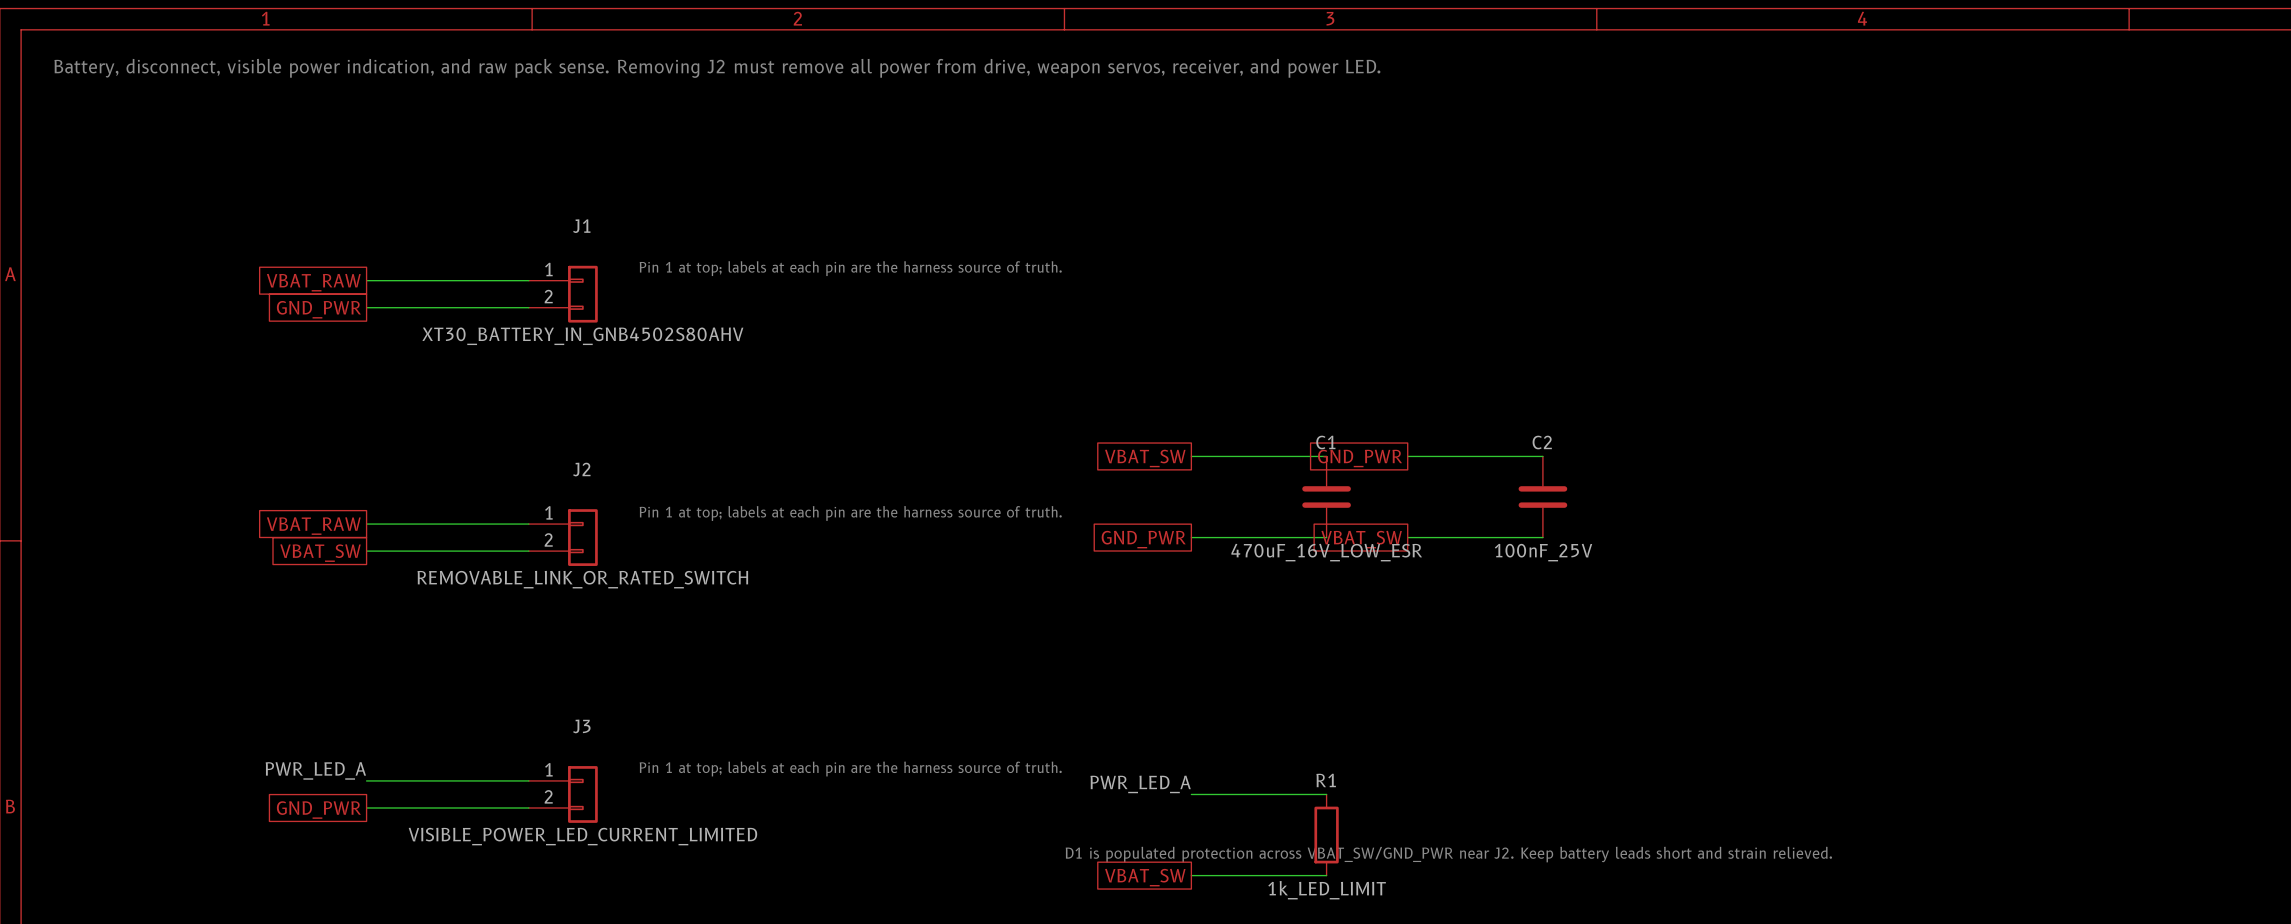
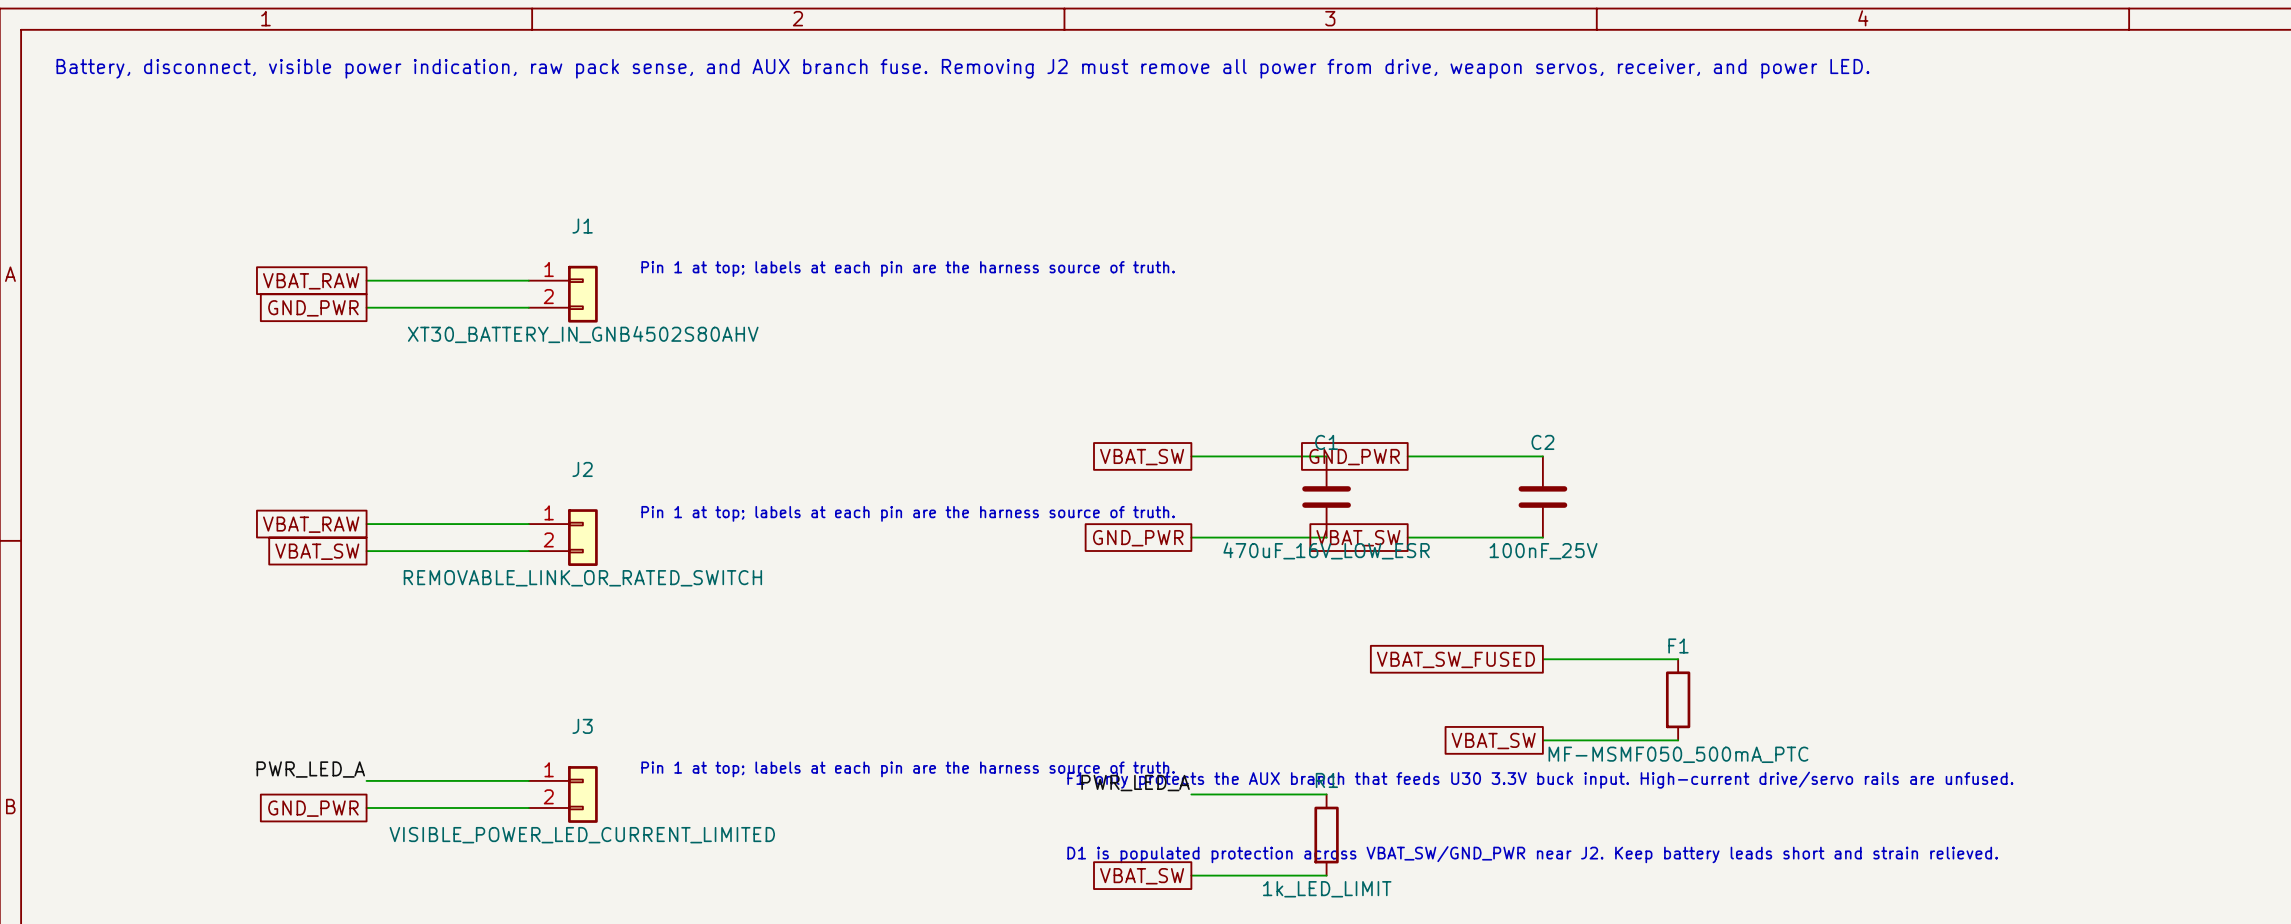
text: Battery, disconnect, visible power indication, and raw pack sense. Removing J2 must remove all power from drive, weapon servos, receiver, and power LED. (717, 68) -> Battery, disconnect, visible power indication, raw pack sense, and AUX branch fuse. Removing J2 must remove all power from drive, weapon servos, receiver, and power LED. (962, 68)
wire: none -> (1542, 659) (1678, 659)
global label: none -> VBAT_SW_FUSED (1455, 659)
F1: none -> MF-MSMF050_500mA_PTC (1678, 699)
wire: none -> (1542, 740) (1678, 740)
global label: none -> VBAT_SW (1493, 741)
text: none -> F1 only protects the AUX branch that feeds U30 3.3V buck input. High-current drive/servo rails are unfused. (1540, 780)

